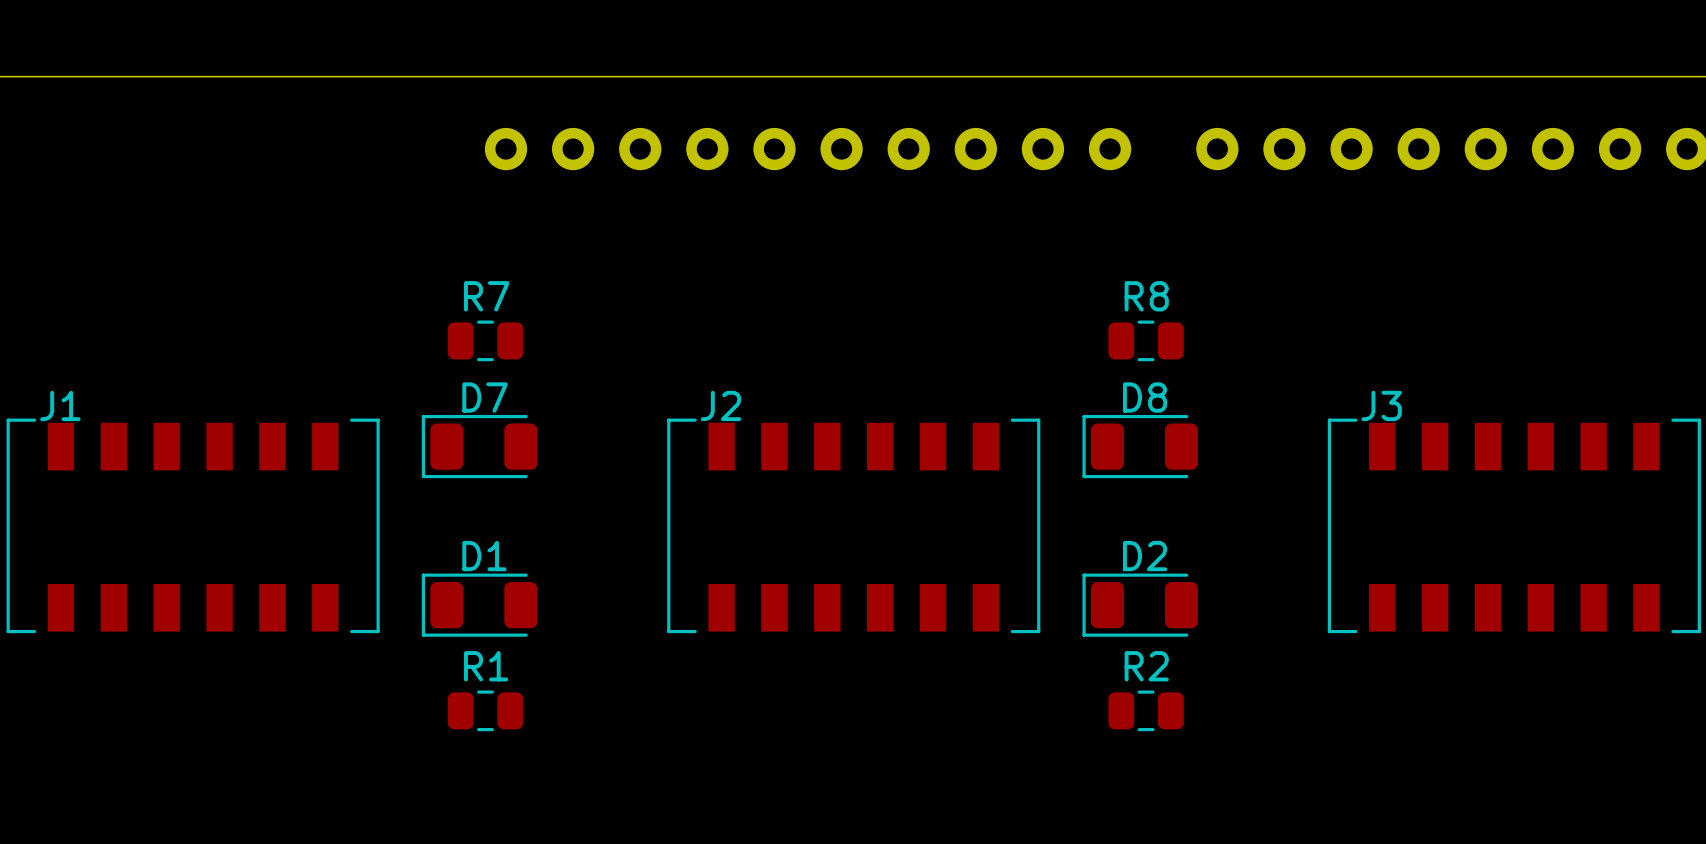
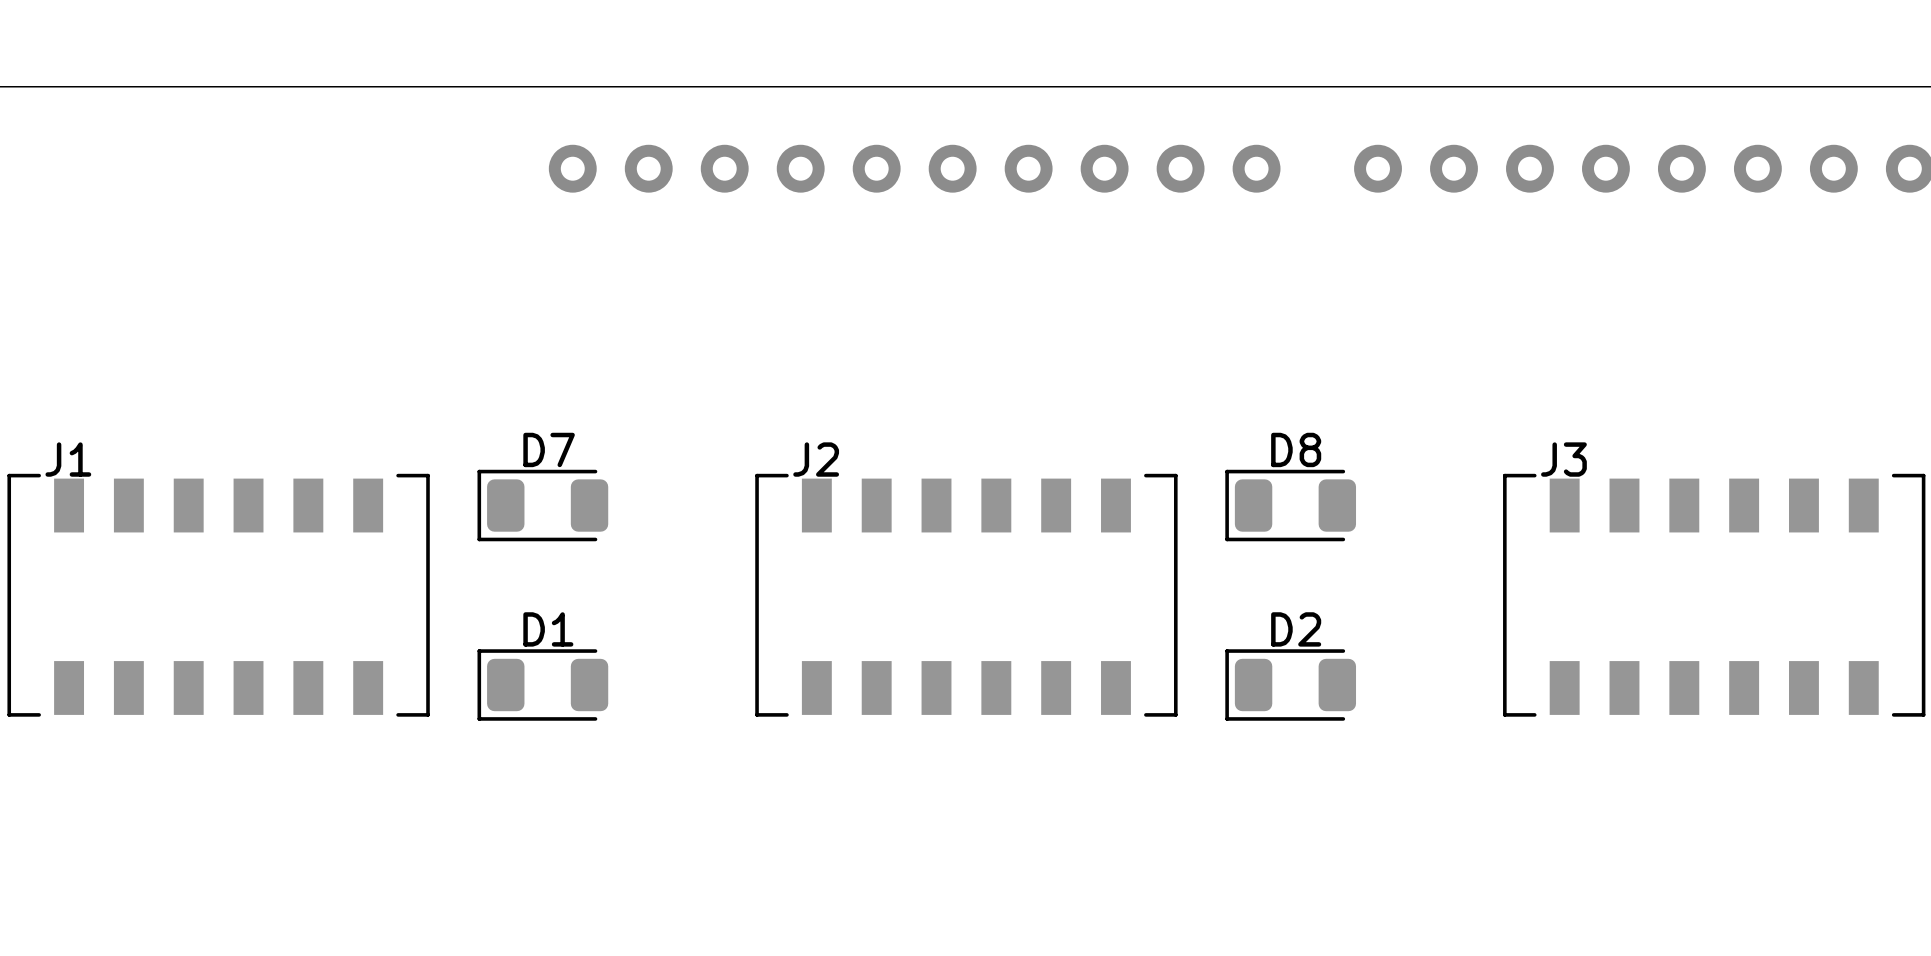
R7: (485, 340) -> none
R8: (1146, 340) -> none
R1: (485, 710) -> none
R2: (1146, 710) -> none

